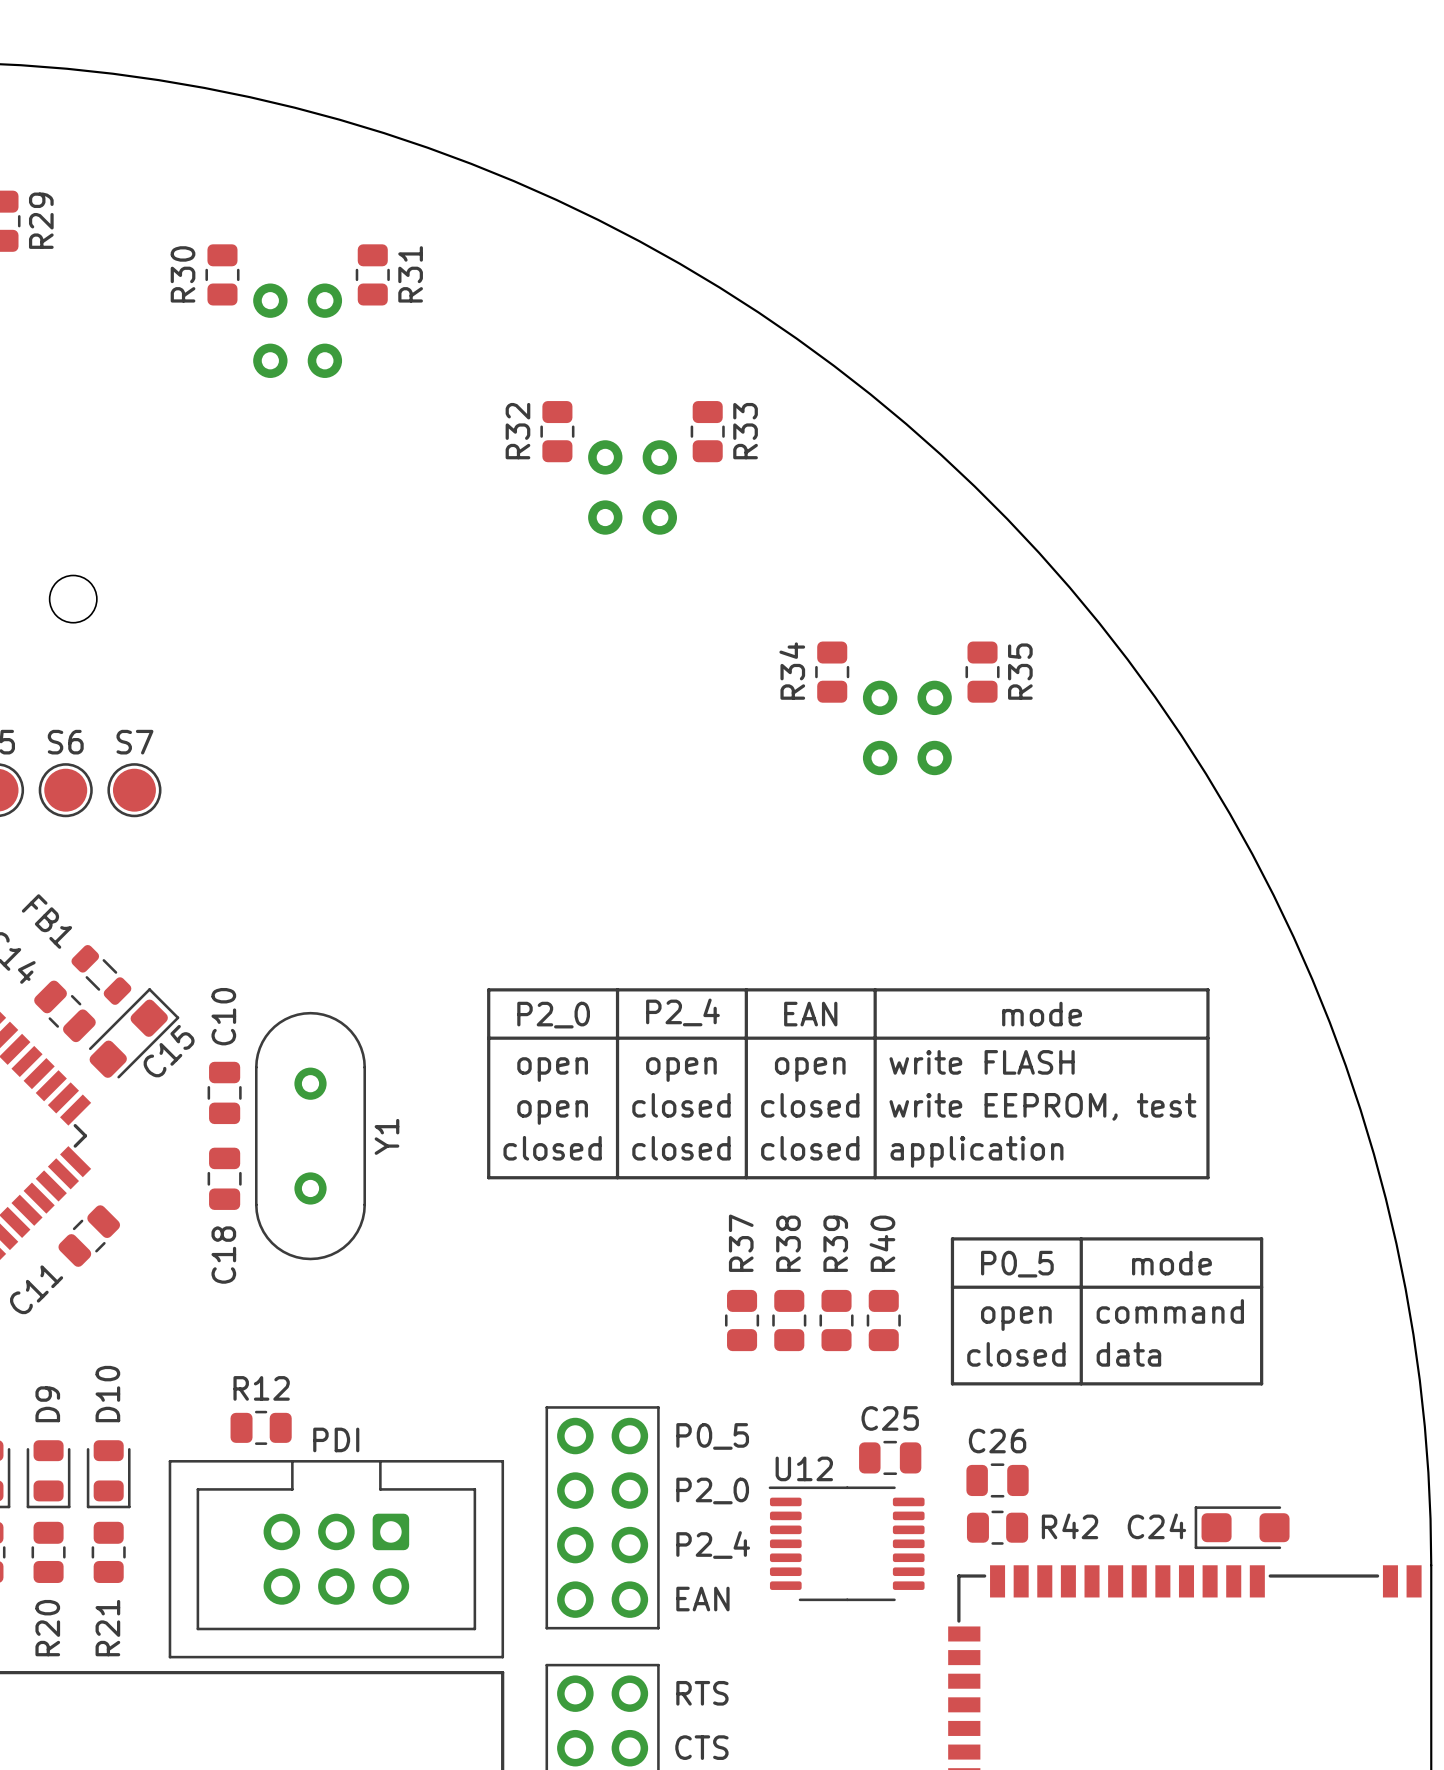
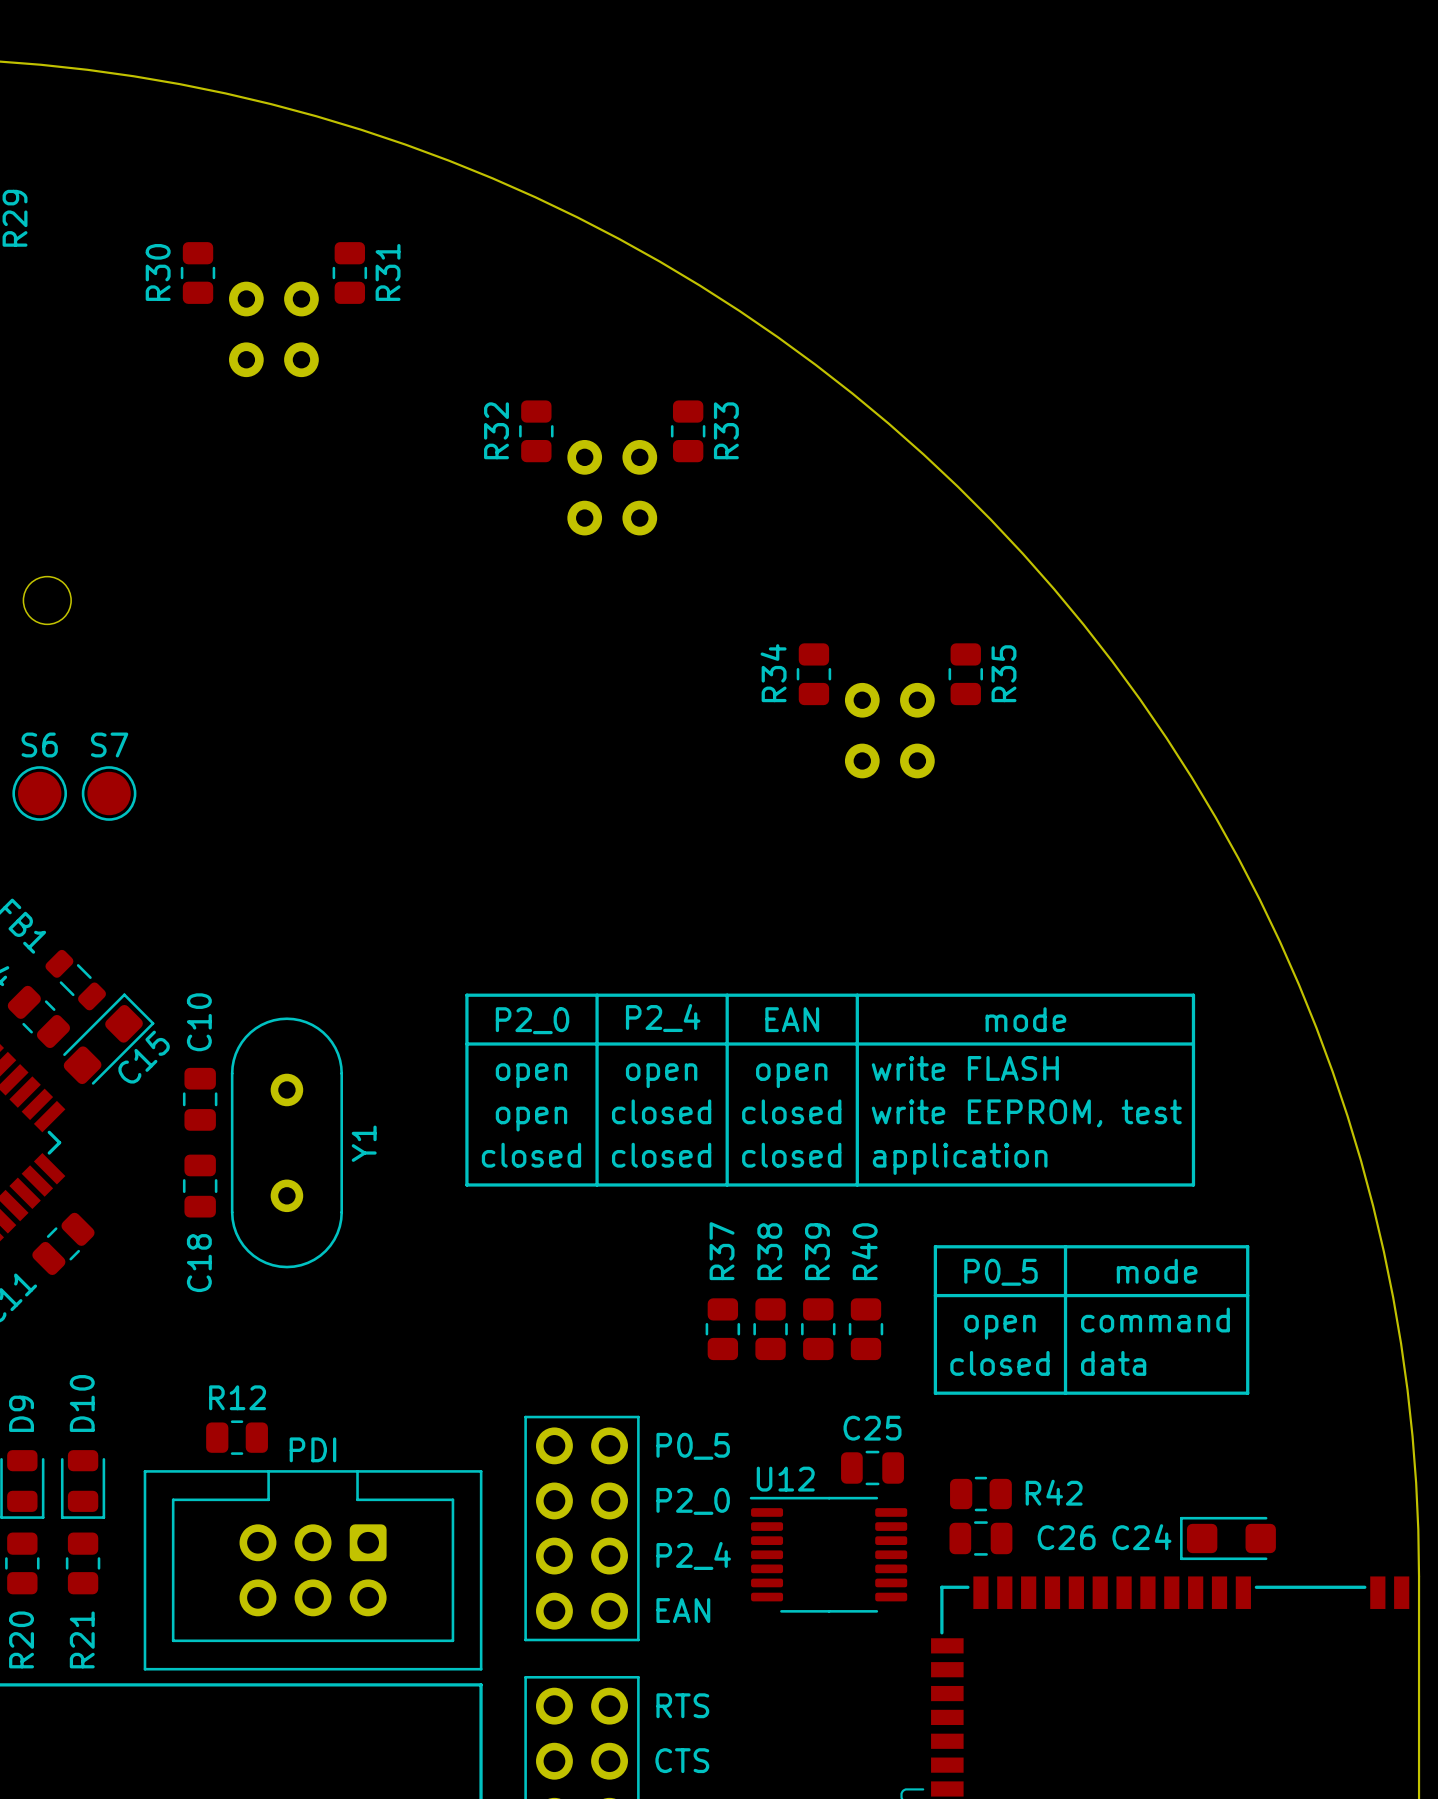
C26 name position: C26 (997, 1441) -> C26 (1066, 1537)
C26 position: (997, 1480) -> (980, 1538)
R42 position: (997, 1527) -> (980, 1494)

